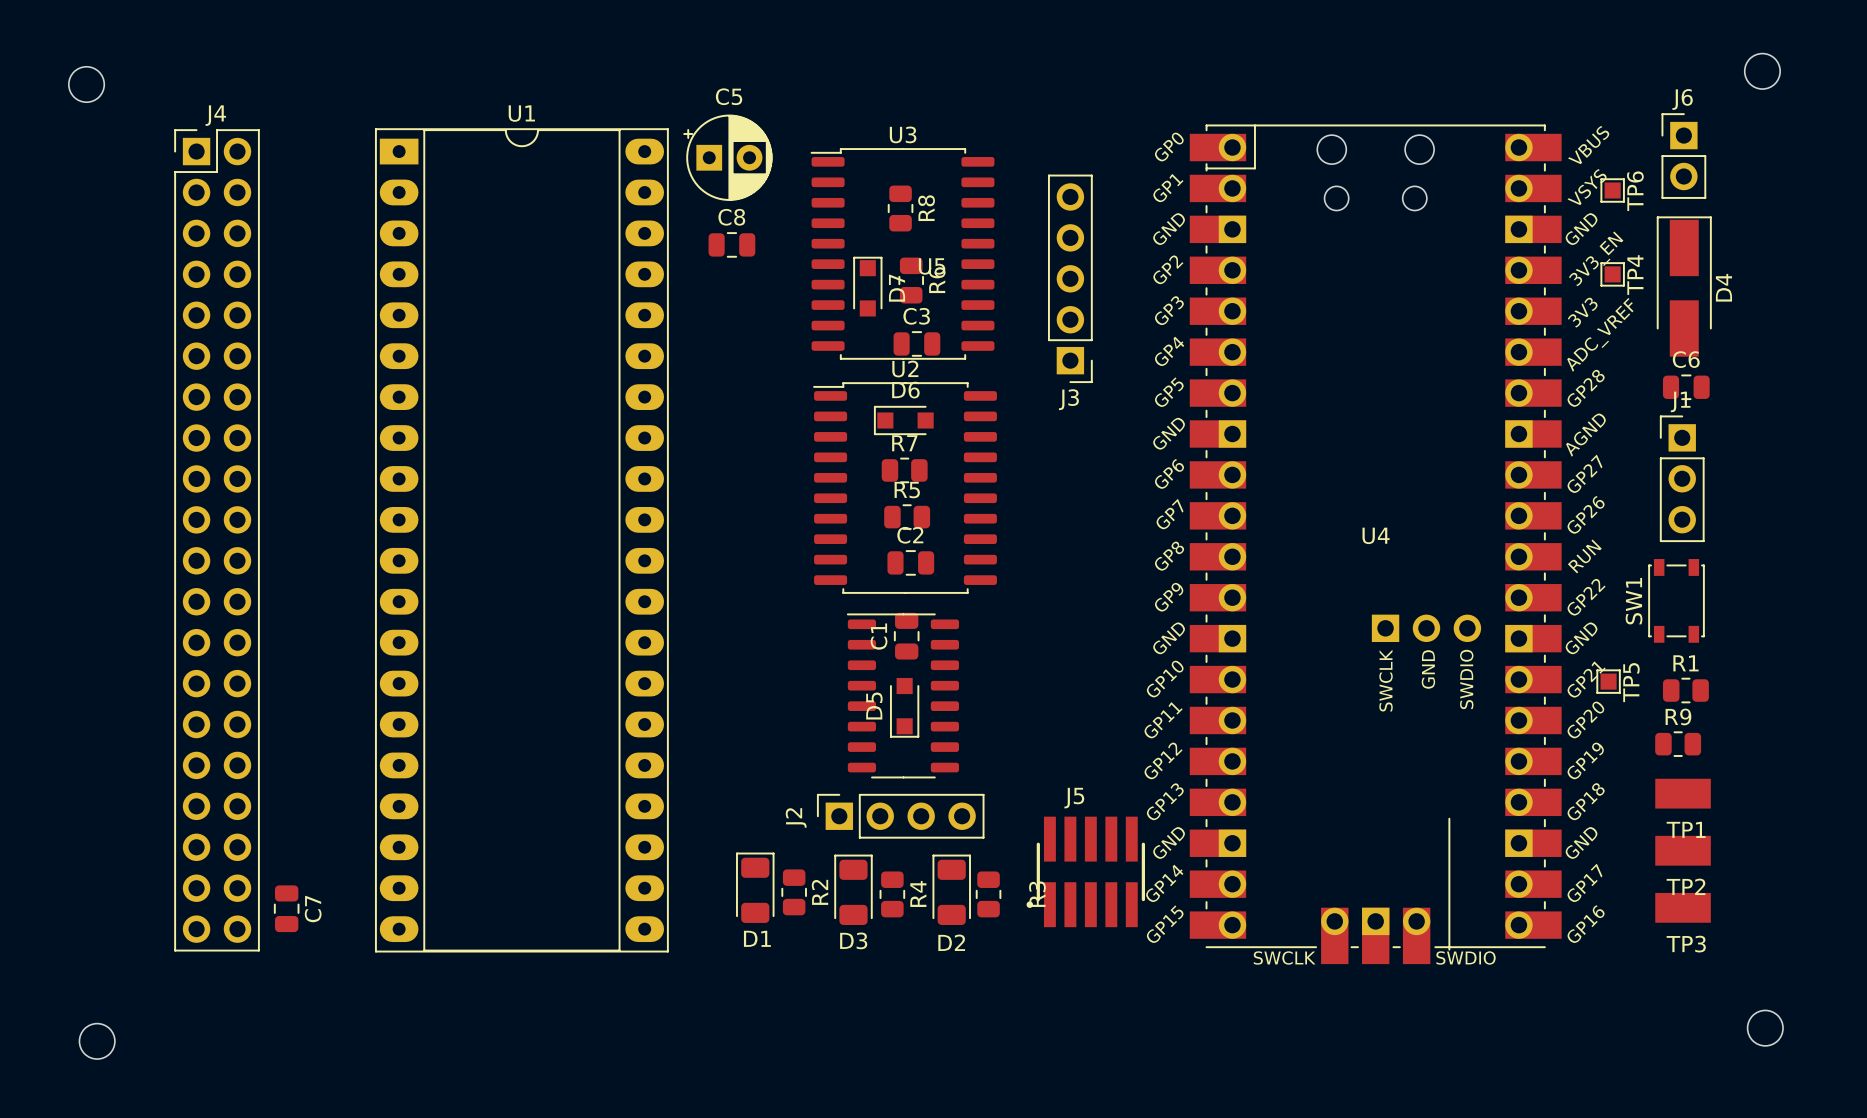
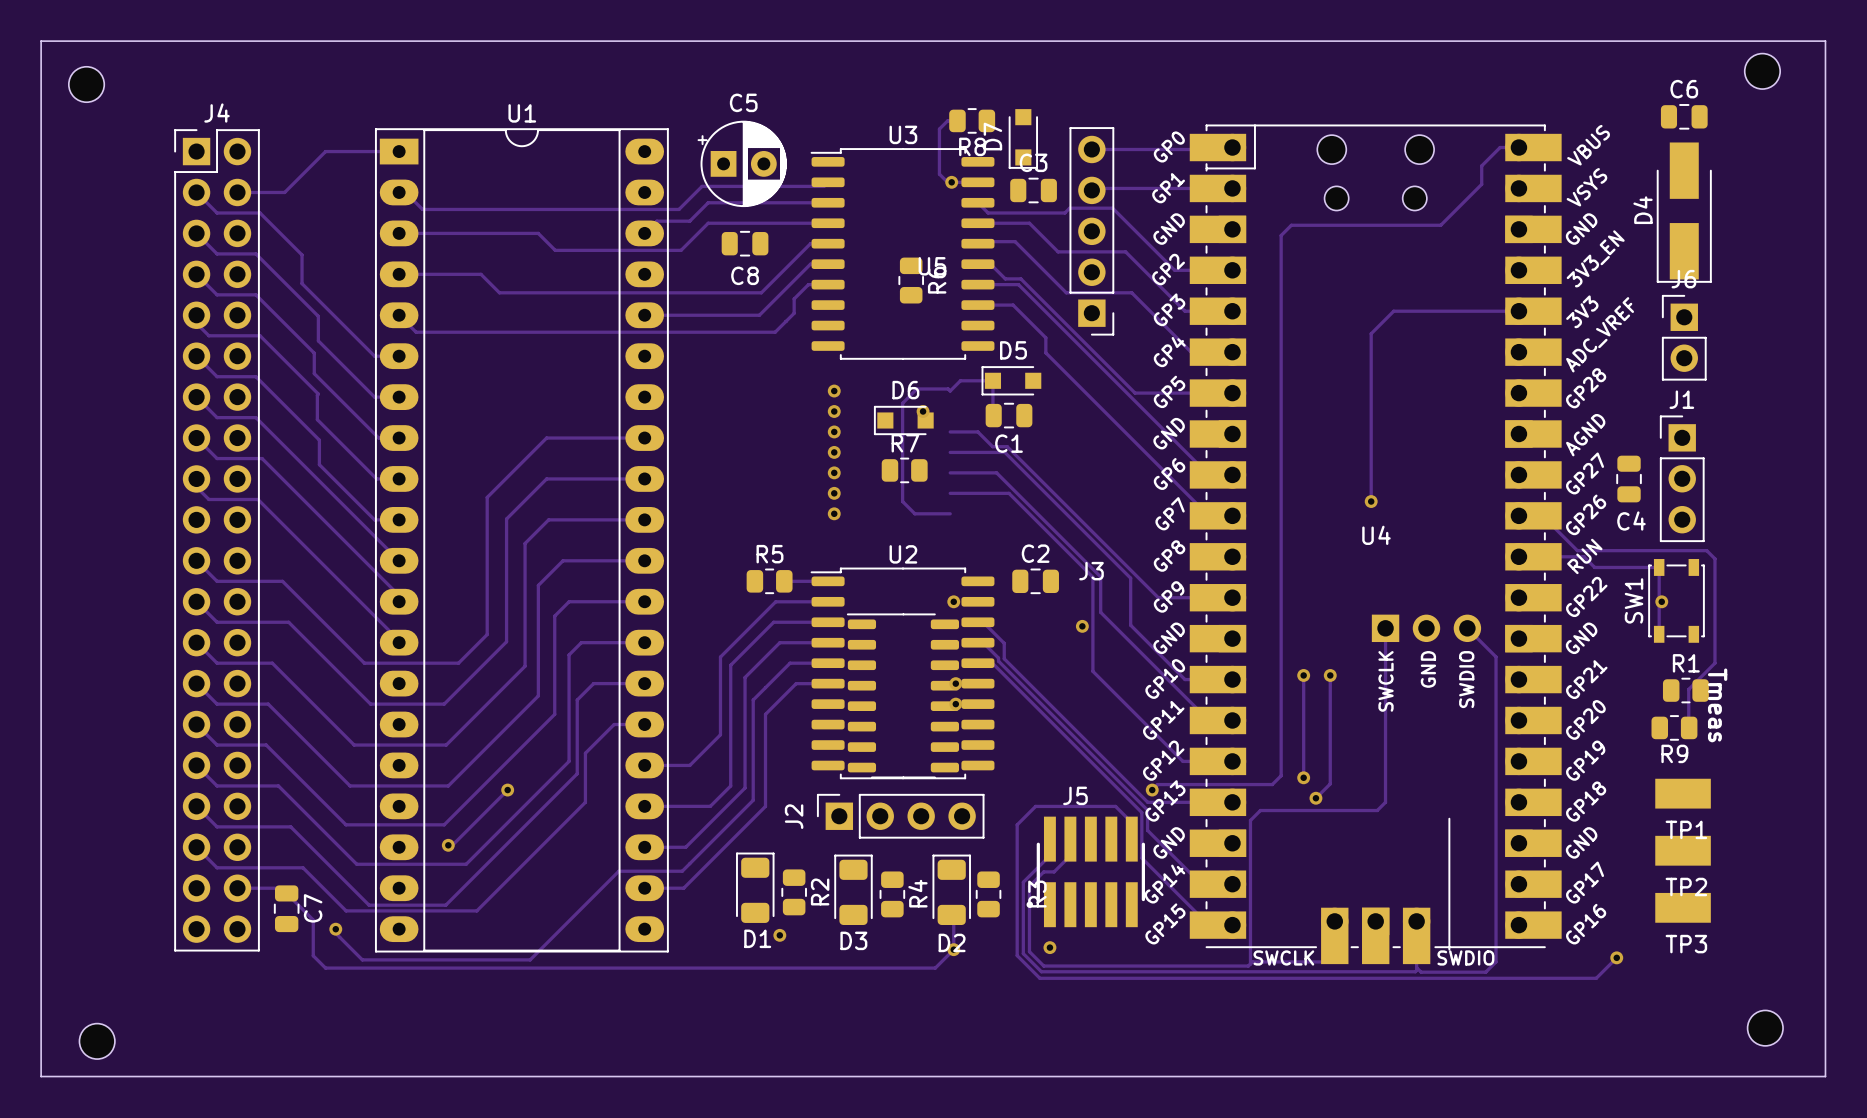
board edge: none -> (41, 41) (1825, 41) (1825, 1076) (41, 1076) (41, 41)
track: none -> (957, 120) (947, 120) (939, 129) (939, 174) (947, 182) (977, 182)
track: none -> (1232, 147) (1230, 149) (1091, 149)
track: none -> (1518, 147) (1500, 147) (1481, 165) (1481, 184) (1440, 225) (1291, 225) (1281, 235) (1281, 775) (1272, 784) (1157, 784) (1152, 790)
track: none -> (399, 151) (325, 151) (284, 192) (237, 192)
J6 position: (1683, 156) -> (1684, 337)
C5 position: (727, 157) -> (742, 163)
track: none -> (828, 182) (823, 186) (702, 186) (679, 209) (422, 209) (405, 192) (399, 192)
via: none -> (951, 182)
track: none -> (1232, 188) (1093, 188) (1091, 190)
TP6: (1612, 190) -> none
track: none -> (196, 192) (217, 213) (260, 213) (302, 254) (302, 283) (374, 356) (399, 356)
track: none -> (828, 202) (708, 202) (689, 221) (656, 221) (644, 233)
track: none -> (977, 202) (988, 213) (1064, 213) (1069, 208) (1112, 208) (1174, 270) (1232, 270)
R8 rotation: 0° (900, 208) -> 90° clockwise (972, 120)
R8 position: (900, 208) -> (972, 120)
C8 name position: C8 (731, 217) -> C8 (745, 275)
track: none -> (828, 223) (708, 223) (681, 250) (555, 250) (538, 233) (399, 233)
track: none -> (977, 223) (1029, 223) (1058, 251) (1125, 251) (1184, 311) (1232, 311)
track: none -> (196, 233) (217, 253) (255, 253) (318, 316) (318, 340) (374, 397) (399, 397)
track: none -> (828, 243) (810, 243) (761, 292) (499, 292) (481, 274) (399, 274)
track: none -> (977, 243) (979, 241) (1015, 241) (1066, 292) (1131, 292) (1191, 352) (1232, 352)
C8 position: (731, 244) -> (745, 243)
track: none -> (828, 264) (810, 264) (759, 315) (644, 315)
track: none -> (977, 264) (990, 264) (1005, 278) (1020, 278) (1135, 393) (1232, 393)
track: none -> (196, 274) (217, 294) (255, 294) (314, 353) (314, 373) (378, 438) (399, 438)
TP4: (1612, 274) -> none
J3 position: (1070, 278) -> (1091, 231)
track: none -> (828, 284) (808, 284) (794, 298) (794, 313) (775, 332) (416, 332) (399, 315)
track: none -> (977, 284) (1018, 284) (1208, 474) (1232, 474)
D7 rotation: 0° (867, 286) -> 180° (1023, 138)
D7 position: (867, 286) -> (1023, 138)
D4 rotation: 0° (1684, 286) -> 180° (1684, 212)
track: none -> (977, 305) (1013, 305) (1045, 337) (1045, 352) (1208, 515) (1232, 515)
track: none -> (1518, 311) (1393, 311) (1371, 333) (1371, 501)
track: none -> (196, 315) (196, 323) (208, 335) (260, 335) (318, 394) (317, 419) (376, 478) (399, 478)
C3 position: (916, 343) -> (1033, 190)
track: none -> (196, 356) (217, 376) (255, 376) (319, 440) (319, 464) (374, 519) (399, 519)
C6 position: (1686, 387) -> (1684, 116)
via: none -> (834, 391)
track: none -> (196, 397) (217, 417) (255, 417) (399, 560)
J3 name position: J3 (1068, 399) -> J3 (1091, 571)
via: none -> (834, 411)
via: none -> (923, 411)
track: none -> (993, 415) (992, 380) (960, 380) (950, 391) (948, 388) (916, 388) (902, 403) (902, 501) (914, 513) (950, 513)
via: none -> (834, 431)
track: none -> (950, 431) (977, 431) (992, 446) (1007, 446) (1158, 597) (1232, 597)
track: none -> (196, 438) (217, 458) (262, 458) (399, 595) (399, 601)
track: none -> (644, 438) (546, 438) (487, 497) (487, 634) (458, 663) (364, 663) (282, 581) (217, 581) (196, 560)
via: none -> (834, 452)
track: none -> (950, 452) (1004, 452) (1130, 578) (1130, 625) (1184, 679) (1232, 679)
via: none -> (834, 472)
track: none -> (950, 472) (996, 472) (1100, 576) (1100, 612) (1208, 720) (1232, 720)
track: none -> (196, 478) (196, 487) (208, 499) (258, 499) (399, 642)
track: none -> (644, 478) (546, 478) (506, 518) (506, 641) (444, 704) (370, 704) (288, 622) (217, 622) (196, 601)
C4: none -> (1629, 479)
U2 position: (905, 488) -> (902, 673)
via: none -> (834, 493)
track: none -> (950, 493) (1009, 493) (1092, 577) (1092, 671) (1182, 761) (1232, 761)
via: none -> (1371, 501)
via: none -> (834, 513)
track: none -> (1518, 515) (1542, 515) (1577, 550) (1706, 550) (1714, 558) (1714, 663) (1688, 689) (1689, 727)
R5 position: (907, 517) -> (769, 581)
track: none -> (644, 519) (548, 519) (525, 543) (525, 666) (446, 745) (354, 745) (272, 663) (217, 663) (196, 642)
track: none -> (1518, 556) (1584, 556) (1594, 567) (1659, 567) (1659, 599) (1661, 601) (1659, 604) (1659, 634)
track: none -> (644, 560) (562, 560) (538, 585) (538, 695) (448, 785) (350, 785) (268, 704) (217, 704) (196, 683)
C2 position: (910, 562) -> (1035, 581)
track: none -> (784, 581) (828, 581)
track: none -> (644, 601) (569, 601) (554, 616) (554, 714) (444, 824) (346, 824) (266, 745) (217, 745) (196, 724)
track: none -> (828, 601) (775, 601) (720, 657) (720, 734) (689, 765) (644, 765)
via: none -> (953, 601)
via: none -> (1661, 601)
track: none -> (828, 622) (773, 622) (730, 665) (730, 785) (710, 806) (644, 806)
track: none -> (977, 622) (983, 622) (1004, 643) (1004, 658) (1147, 802) (1232, 802)
via: none -> (1082, 626)
track: none -> (1385, 628) (1385, 802) (1377, 810) (1260, 810) (1250, 820) (1250, 963)
track: none -> (1467, 628) (1496, 656) (1496, 961) (1485, 972) (1421, 972) (1416, 967)
C1 name position: C1 (879, 636) -> C1 (1009, 443)
C1 rotation: 0° (906, 636) -> 90° clockwise (1009, 415)
C1 position: (906, 636) -> (1009, 415)
track: none -> (644, 642) (581, 642) (569, 655) (569, 761) (466, 864) (356, 864) (278, 785) (217, 785) (196, 765)
track: none -> (828, 642) (779, 642) (745, 677) (745, 788) (685, 847) (644, 847)
track: none -> (977, 642) (983, 642) (998, 658) (998, 661) (1147, 810) (1147, 830) (1201, 884) (1232, 884)
track: none -> (828, 663) (790, 663) (753, 700) (753, 800) (682, 871) (618, 871) (530, 959) (362, 959) (335, 933) (335, 929)
track: none -> (977, 663) (992, 663) (1141, 812) (1141, 858) (1208, 925) (1232, 925)
track: none -> (1303, 675) (1303, 777)
via: none -> (1303, 675)
track: none -> (1330, 675) (1330, 783) (1315, 798)
via: none -> (1330, 675)
TP5: (1608, 681) -> none
track: none -> (644, 683) (593, 683) (577, 700) (577, 773) (445, 905) (369, 905) (290, 826) (217, 826) (196, 806)
track: none -> (828, 683) (796, 683) (765, 714) (765, 806) (683, 888) (644, 888)
via: none -> (955, 683)
via: none -> (955, 704)
text: none -> Tmeas (1717, 705)
D5 rotation: 0° (904, 707) -> 90° clockwise (1011, 380)
D5 position: (904, 707) -> (1011, 380)
R9 name position: R9 (1678, 716) -> R9 (1674, 753)
track: none -> (644, 724) (614, 724) (585, 753) (585, 802) (476, 910) (346, 910) (303, 867) (217, 867) (196, 847)
R9 position: (1678, 744) -> (1674, 727)
via: none -> (1303, 777)
track: none -> (507, 790) (452, 845) (448, 845)
via: none -> (507, 790)
via: none -> (1152, 790)
via: none -> (1315, 798)
track: none -> (1049, 839) (1049, 855) (1023, 882) (1023, 953) (1041, 971) (1415, 971) (1416, 921)
track: none -> (1070, 839) (1070, 855) (1054, 871) (1043, 871) (1029, 886) (1029, 951) (1043, 966) (1248, 966) (1252, 961) (1332, 961)
track: none -> (1131, 839) (1131, 822) (1115, 806) (1035, 806) (1017, 824) (1017, 955) (1039, 978) (1596, 978) (1616, 957)
via: none -> (448, 845)
track: none -> (237, 888) (281, 888) (313, 920) (313, 955) (325, 968) (935, 968) (953, 949) (953, 916) (951, 914) (953, 912)
via: none -> (335, 929)
via: none -> (779, 935)
via: none -> (1049, 947)
via: none -> (953, 949)
via: none -> (1616, 957)

